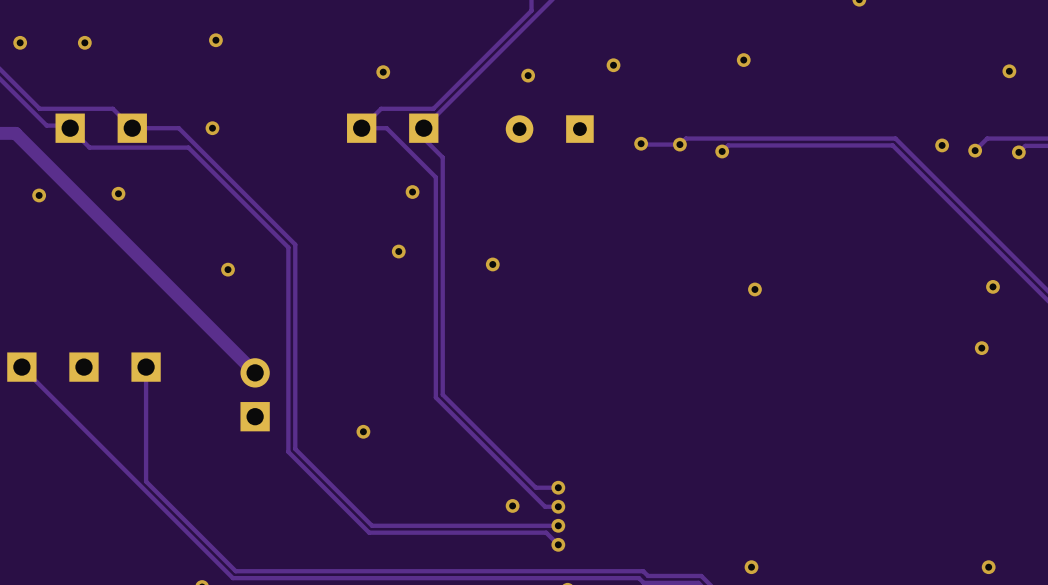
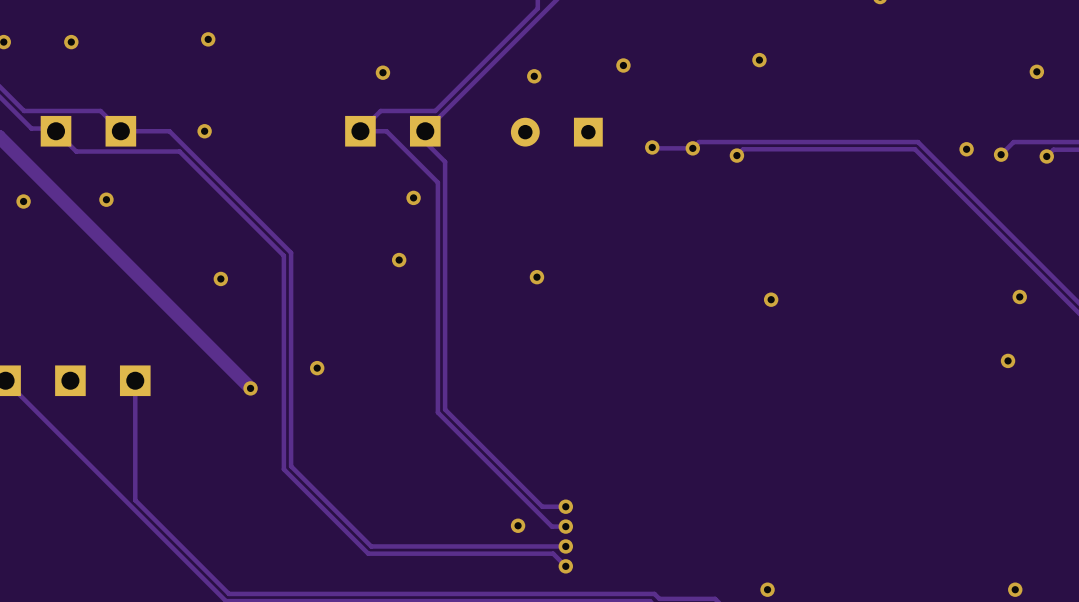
via position: (492, 264) -> (536, 277)
via: none -> (317, 368)
via: none -> (250, 388)
part: (255, 394) -> none
via: (363, 431) -> none

